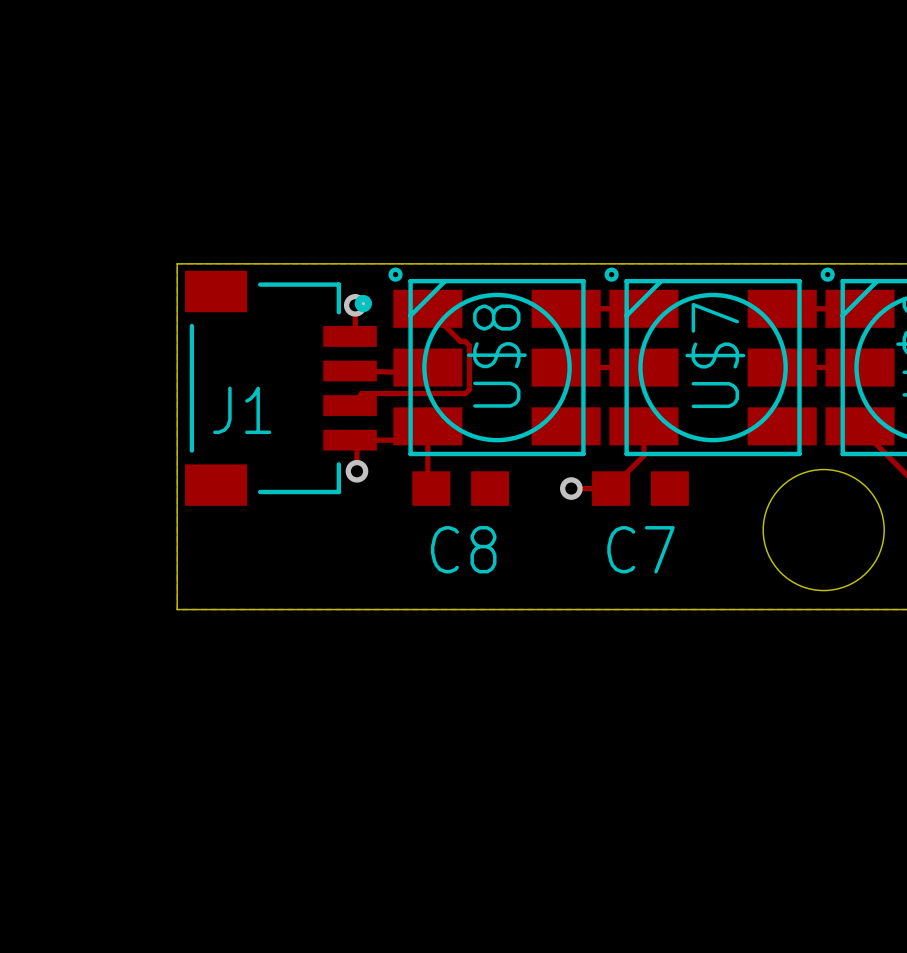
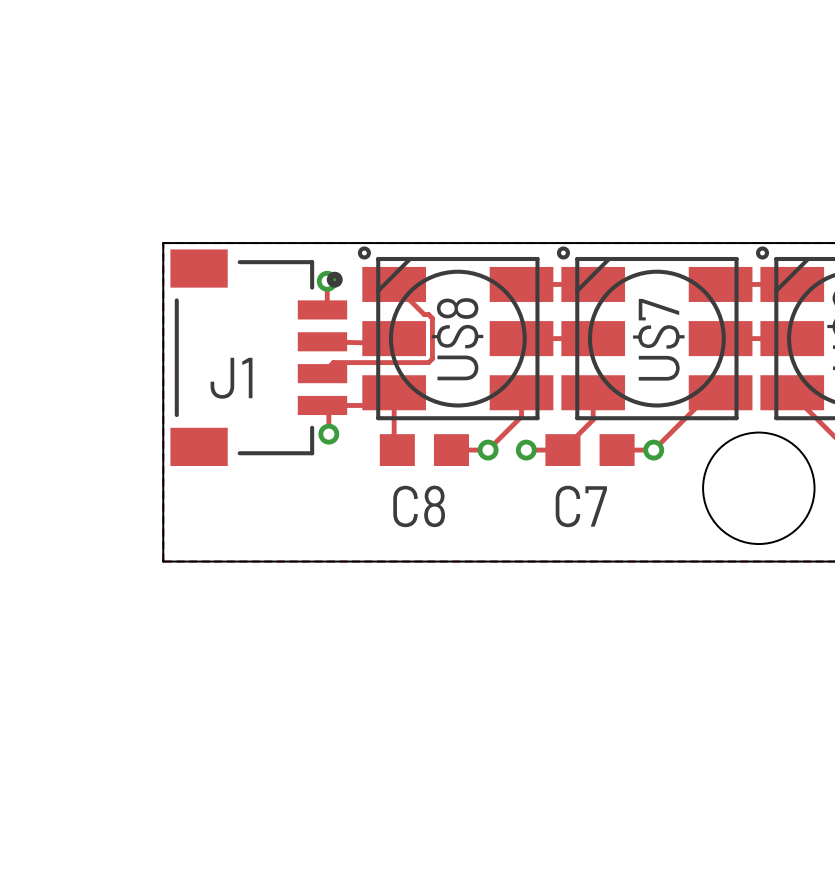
top track: none -> (706, 390) (706, 397) (653, 450) (617, 450)
top track: none -> (521, 392) (521, 416) (488, 450) (451, 450)
via: none -> (488, 450)
via: none -> (653, 450)

